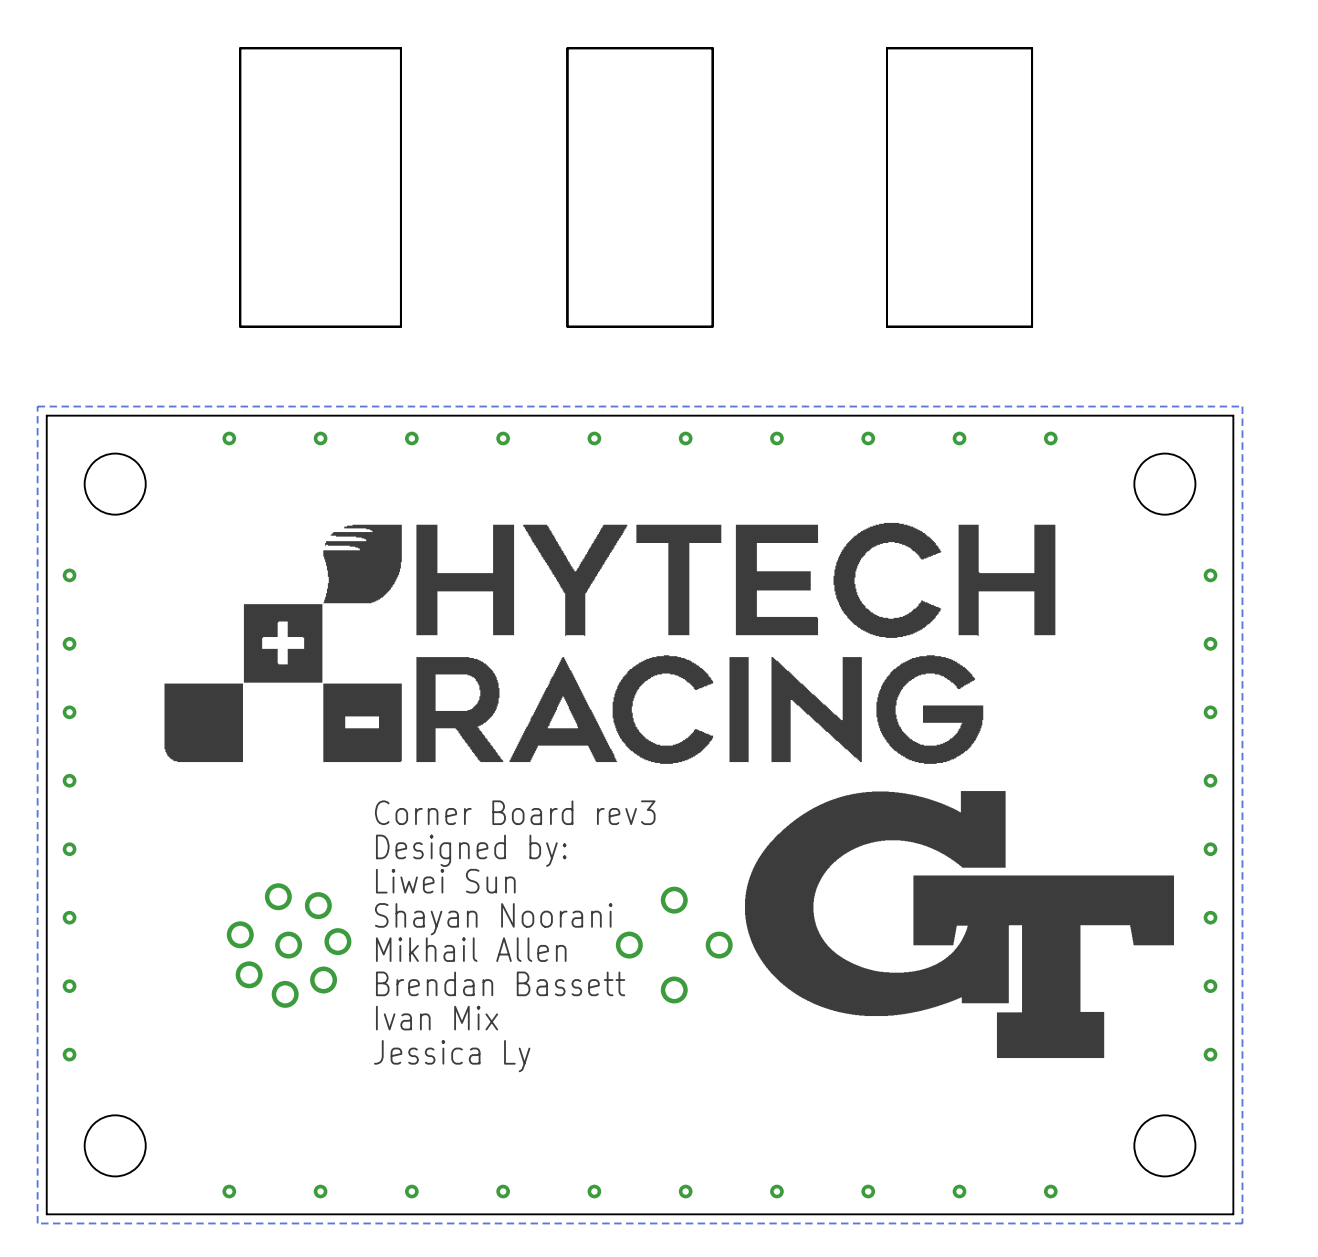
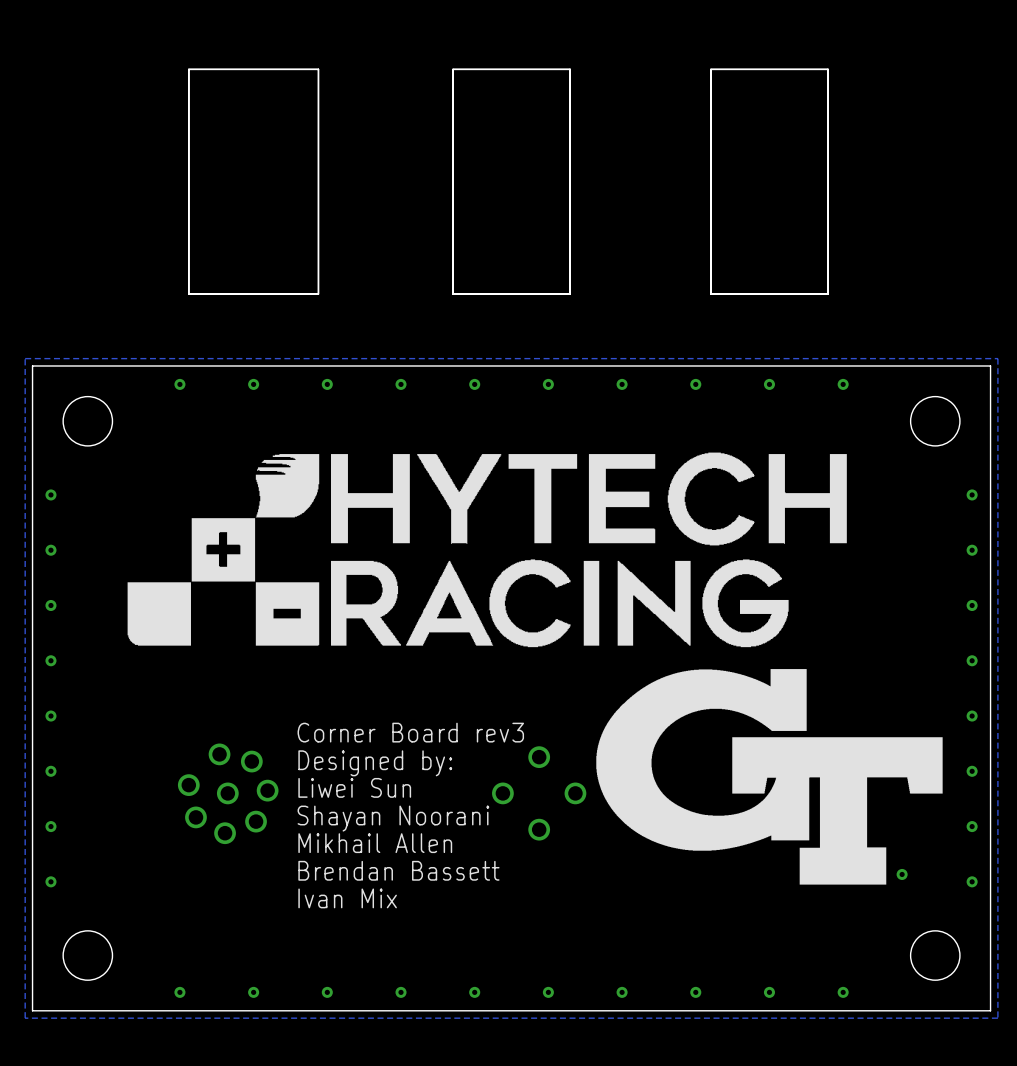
text position: Corner Board rev3 (515, 812) -> Corner Board rev3 (410, 732)
text position: Designed by: (471, 850) -> Designed by: (375, 763)
text position: Liwei Sun (445, 881) -> Liwei Sun (354, 787)
text position: Shayan Noorani (493, 919) -> Shayan Noorani (393, 818)
text position: Mikhail Allen (471, 949) -> Mikhail Allen (375, 843)
text position: Brendan Bassett (500, 983) -> Brendan Bassett (398, 870)
text position: Ivan Mix (437, 1018) -> Ivan Mix (347, 898)
via: none -> (902, 874)
text: Jessica Ly (452, 1056) -> none

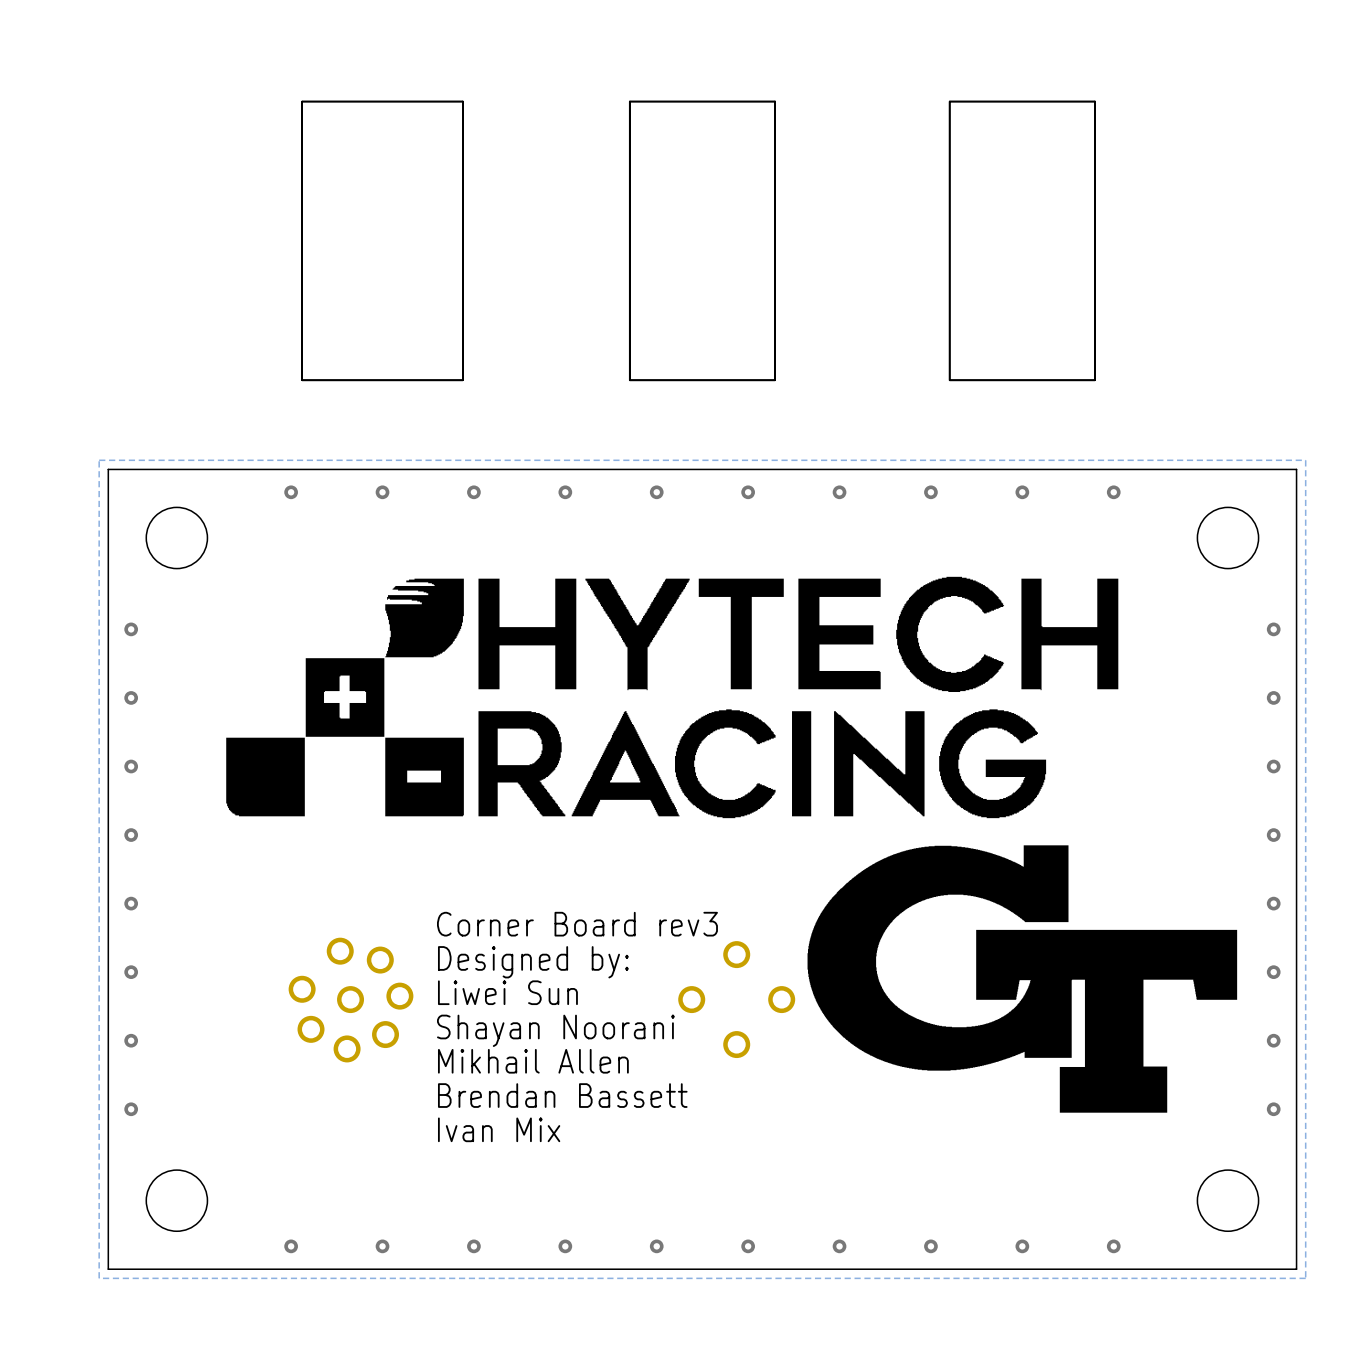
via: (902, 874) -> none

